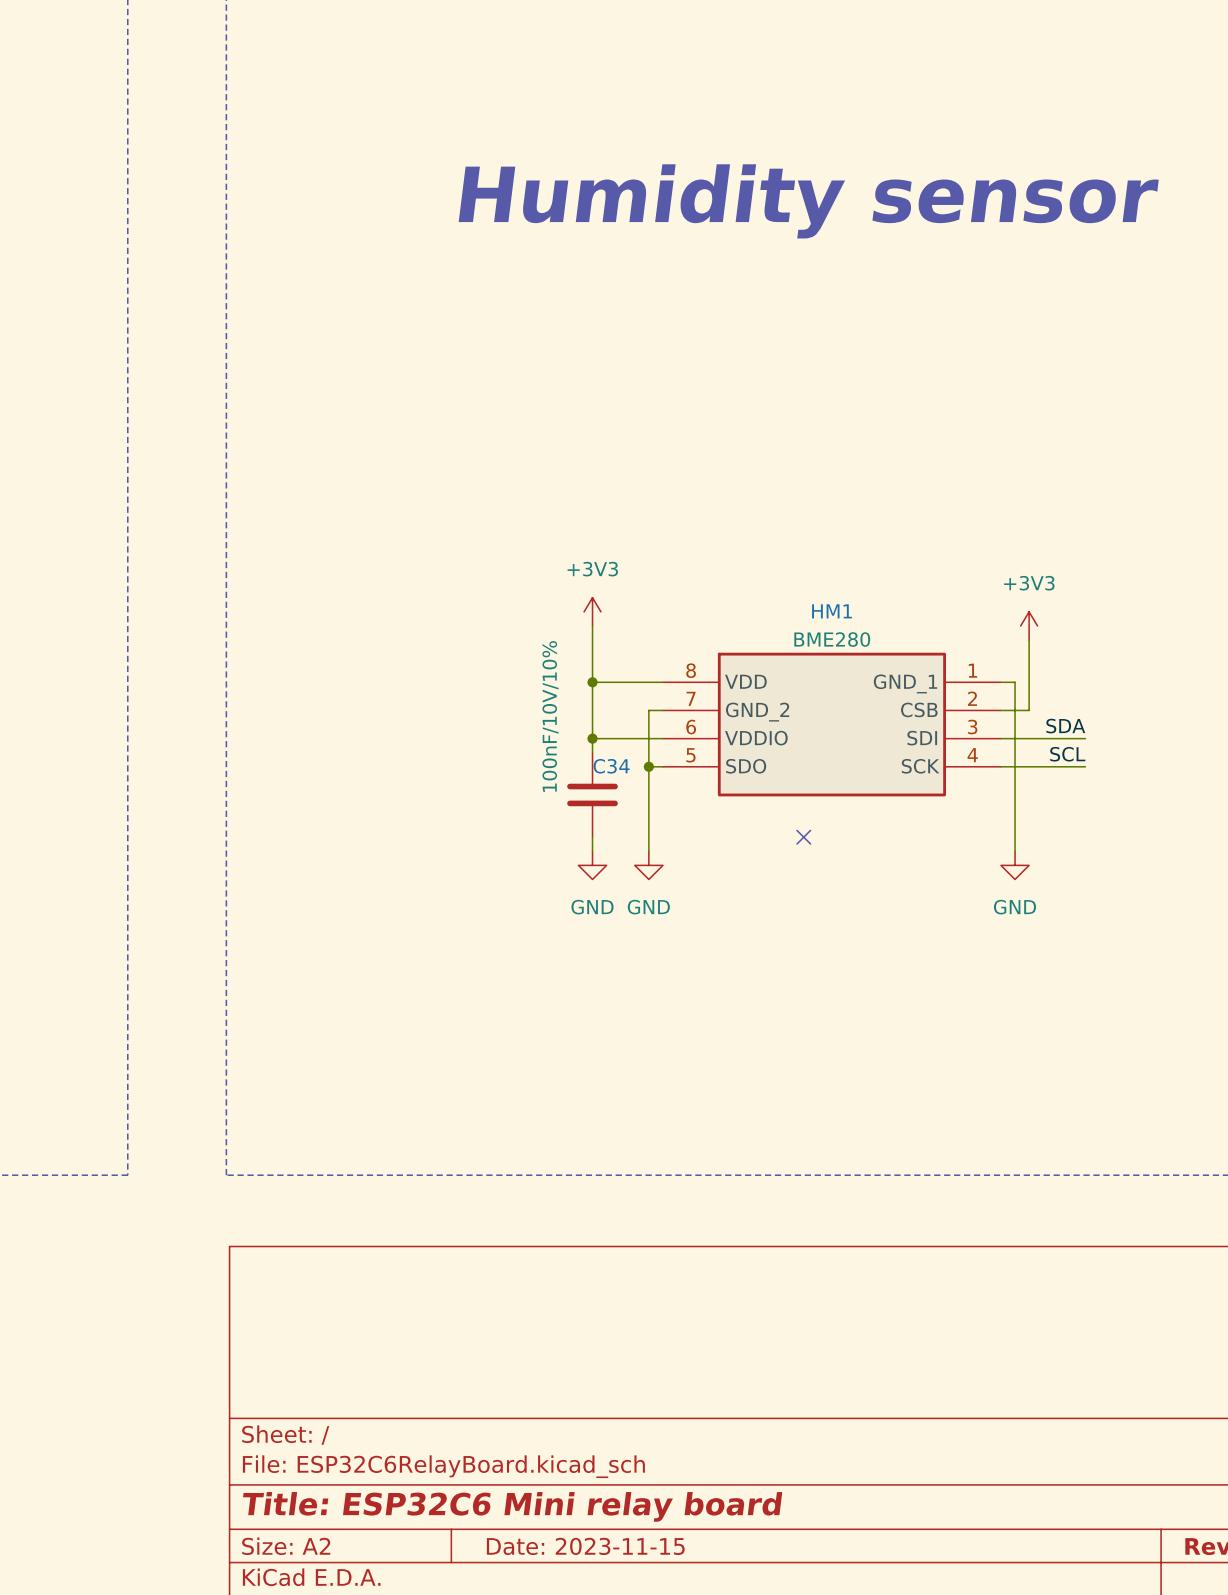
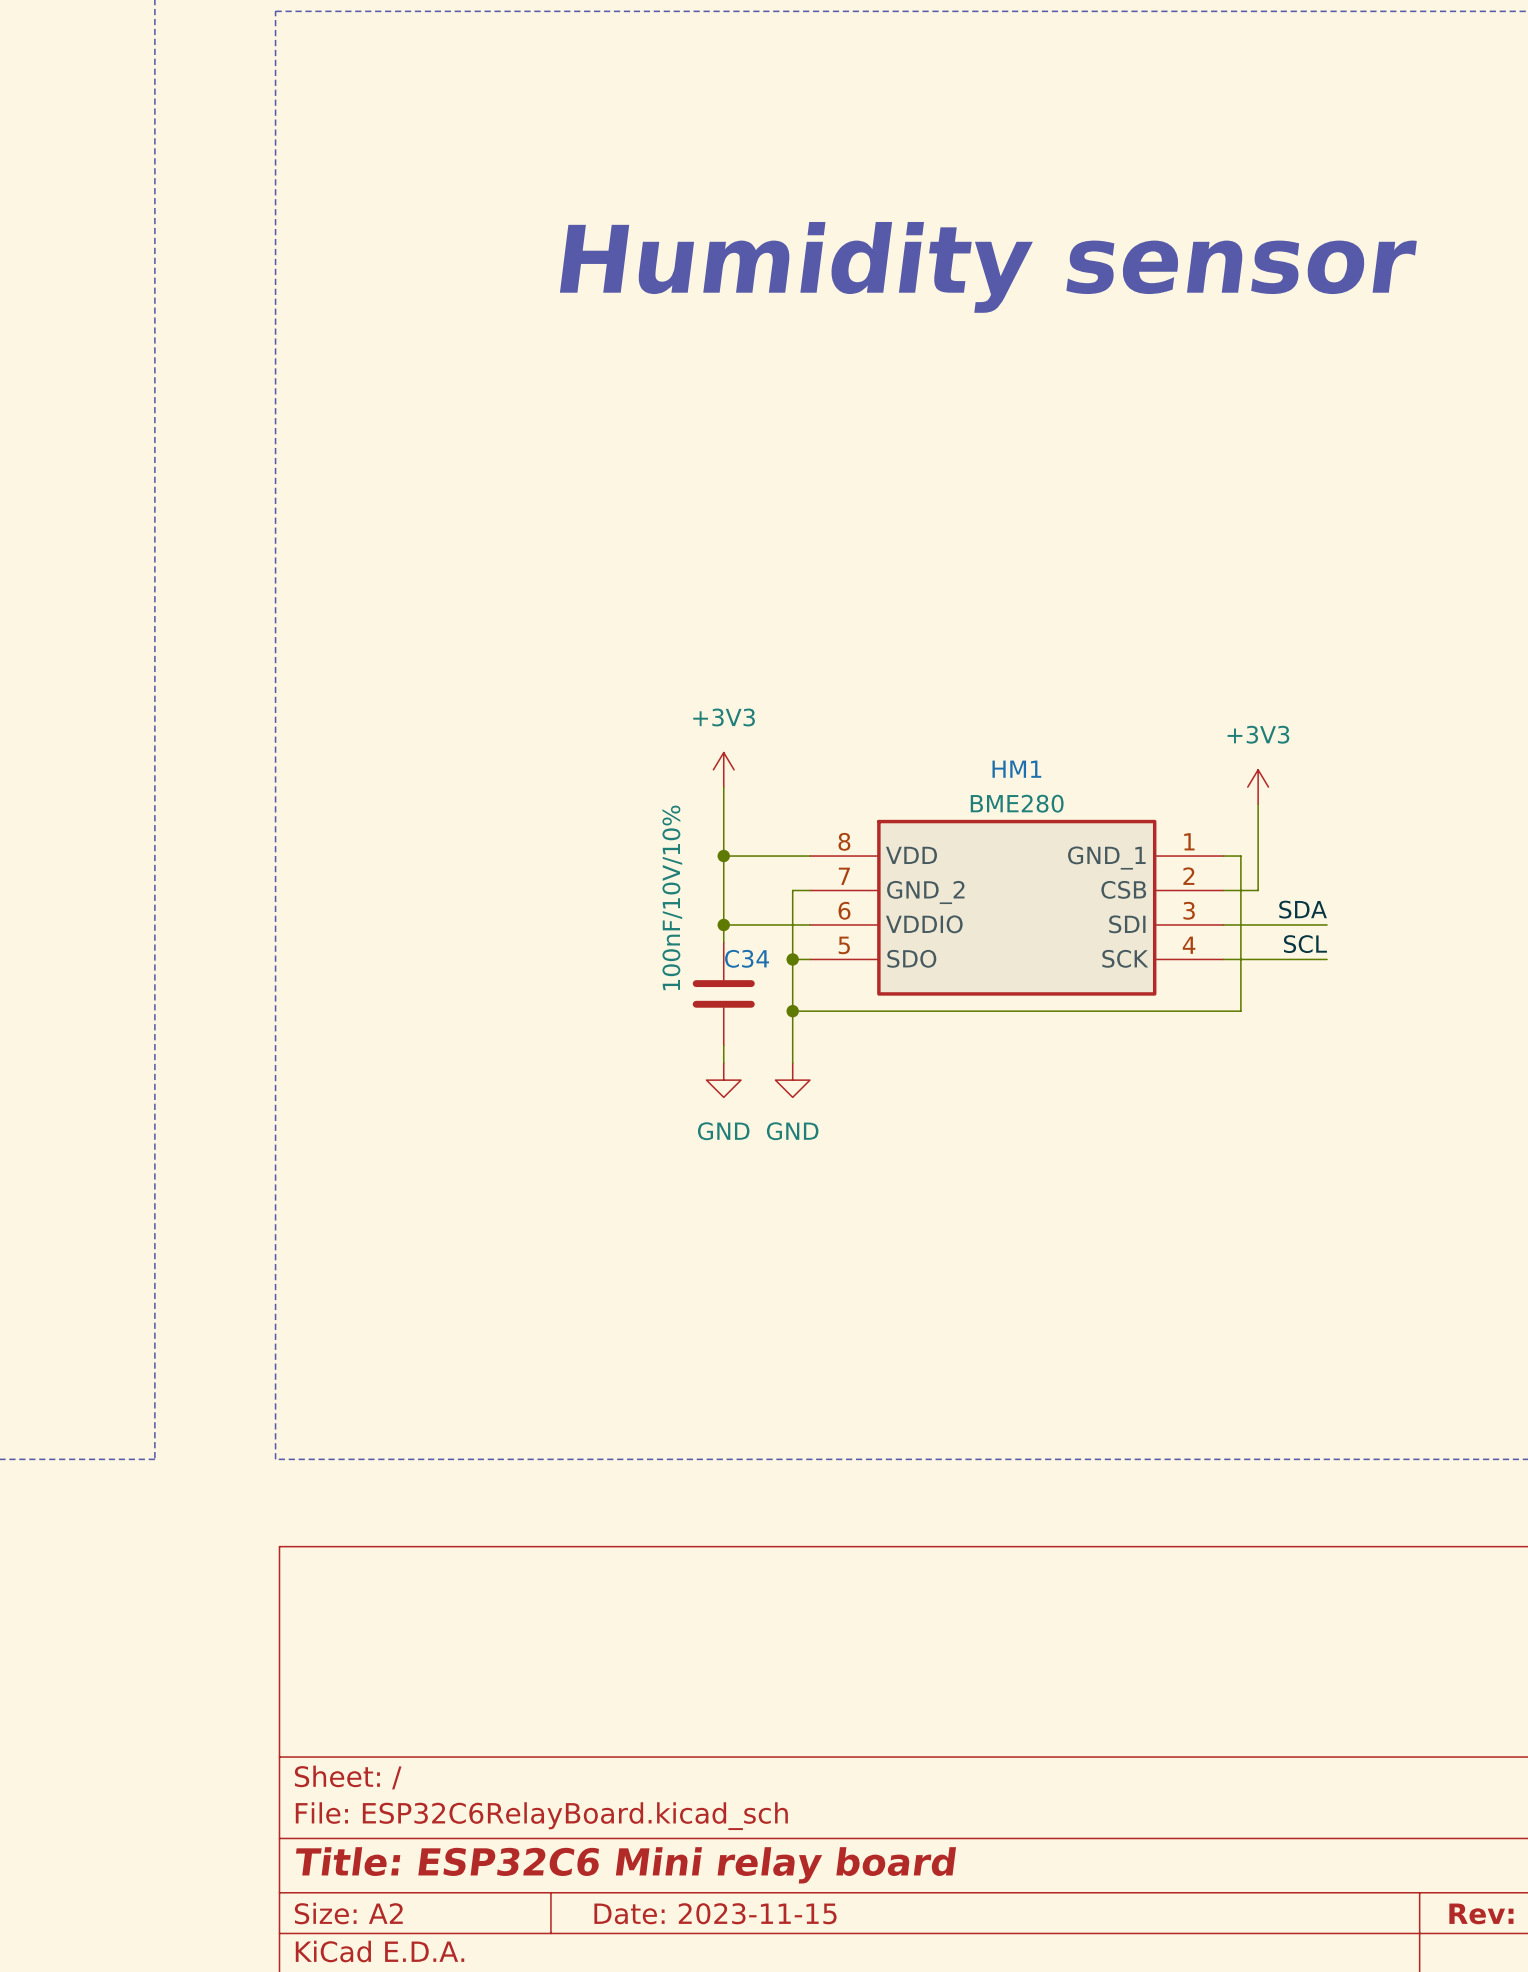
junction: none -> (792, 1011)
wire: (1015, 809) (1015, 851) -> (1240, 1011) (792, 1011)
no-connect mark: (803, 837) -> none
power symbol: GND (1015, 865) -> none

